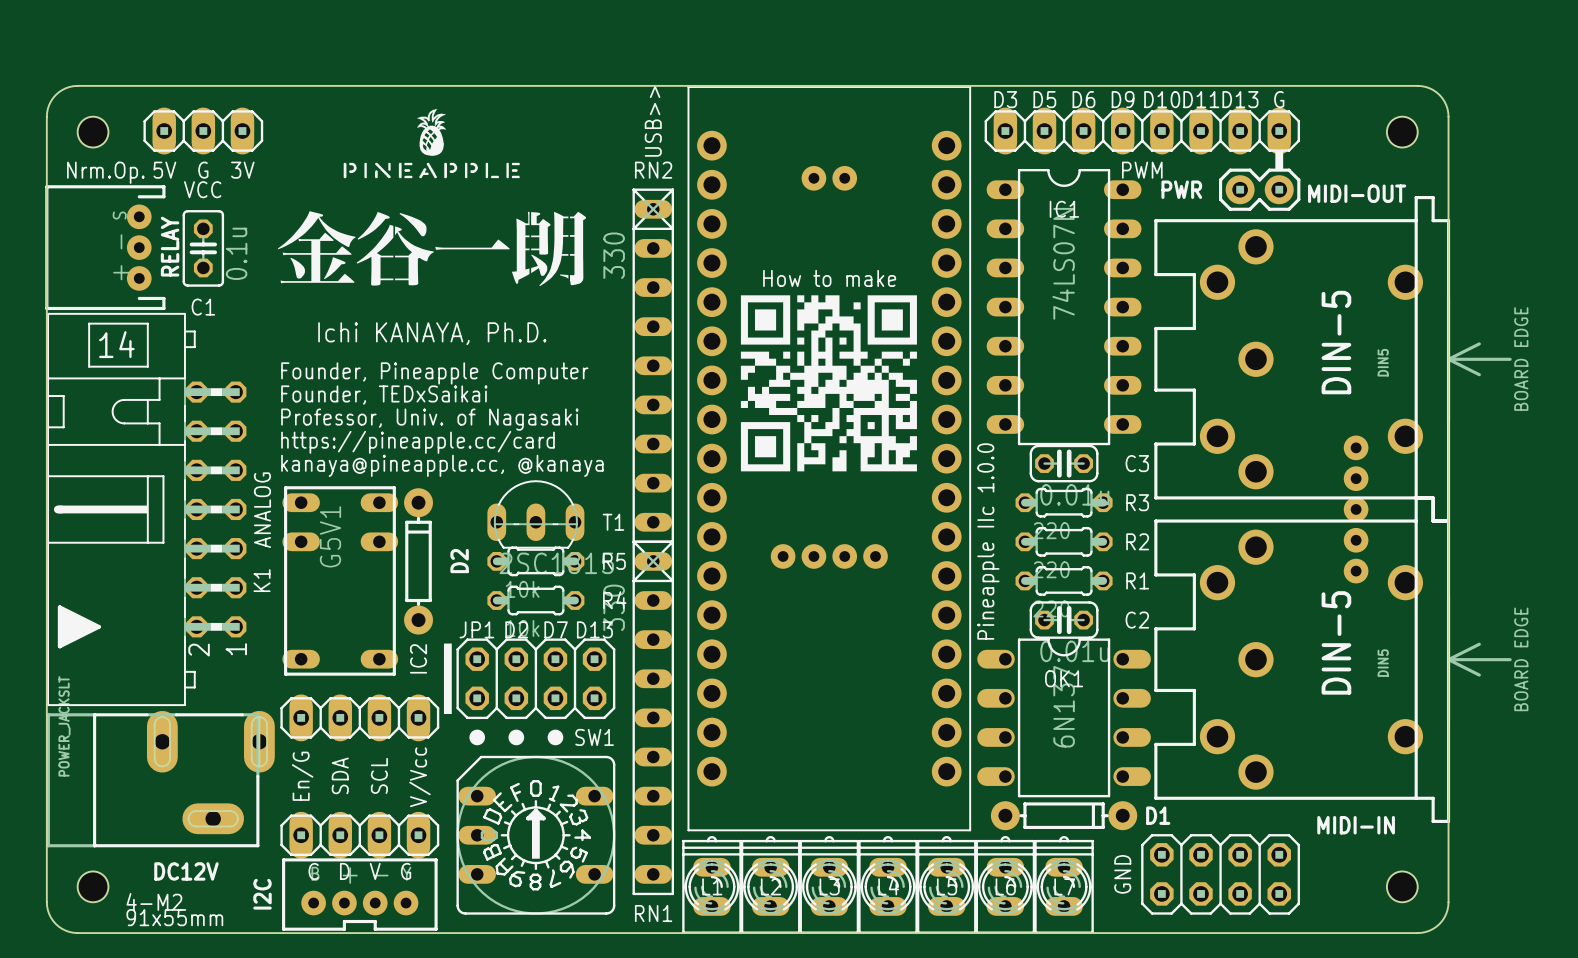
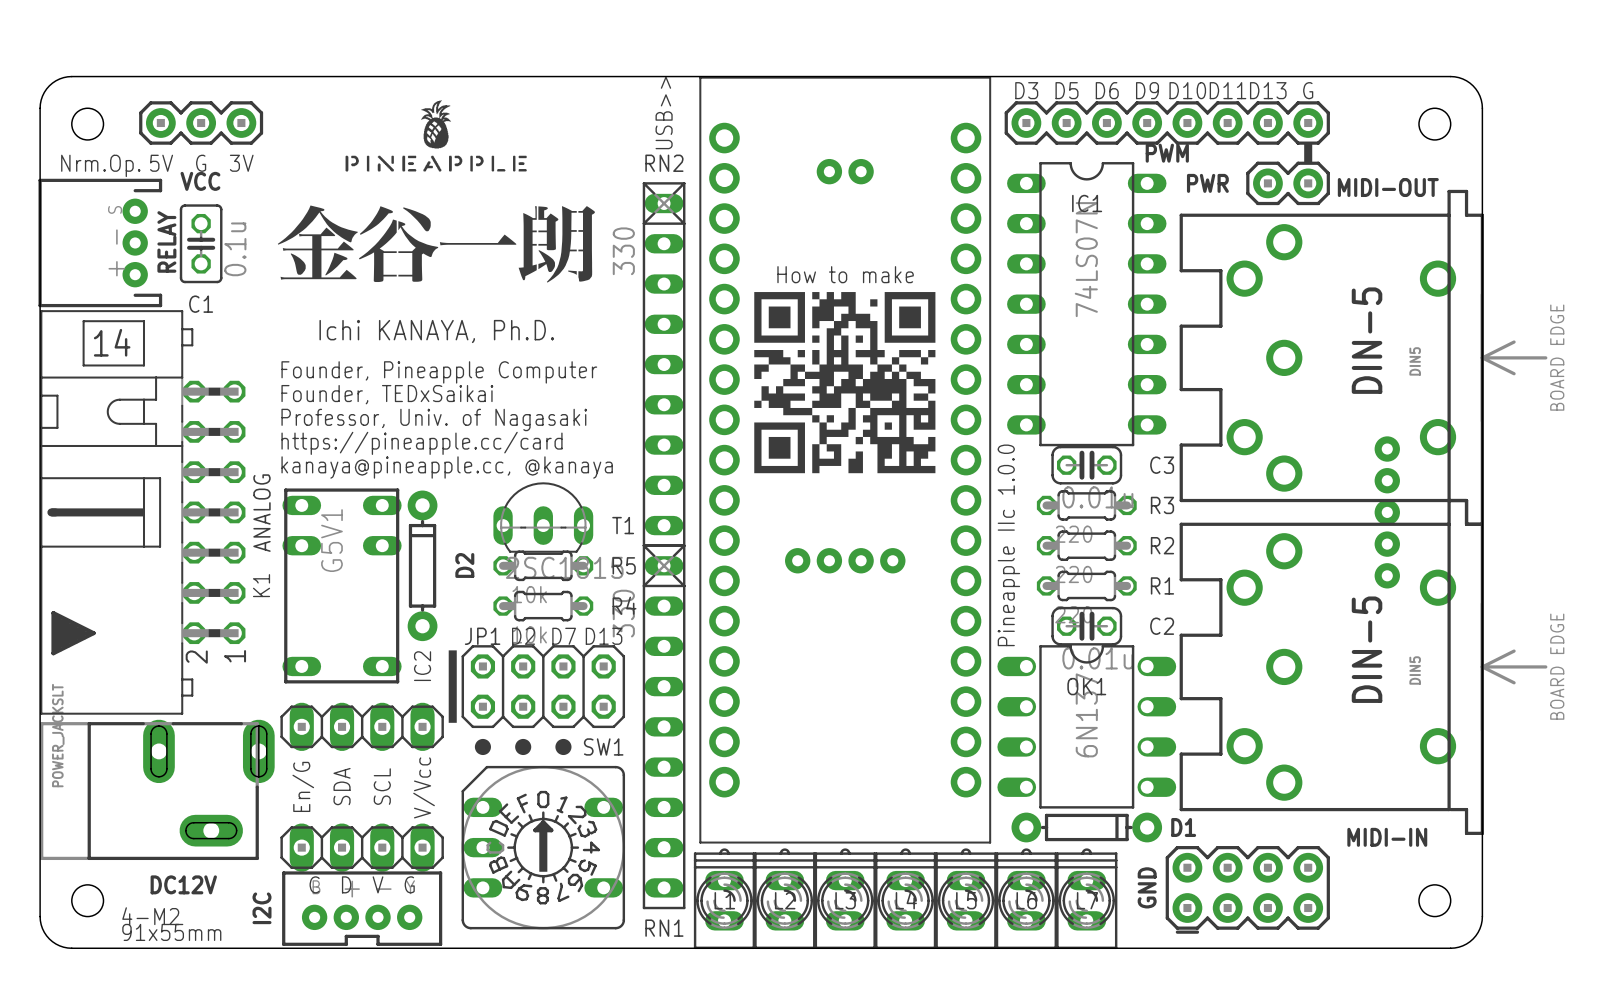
VCC footprint: [143, 107, 264, 155] -> [139, 101, 264, 145]
PWM footprint: [984, 107, 1300, 155] -> [1004, 101, 1330, 145]
GND footprint: [1141, 834, 1300, 915] -> [1165, 846, 1330, 934]

